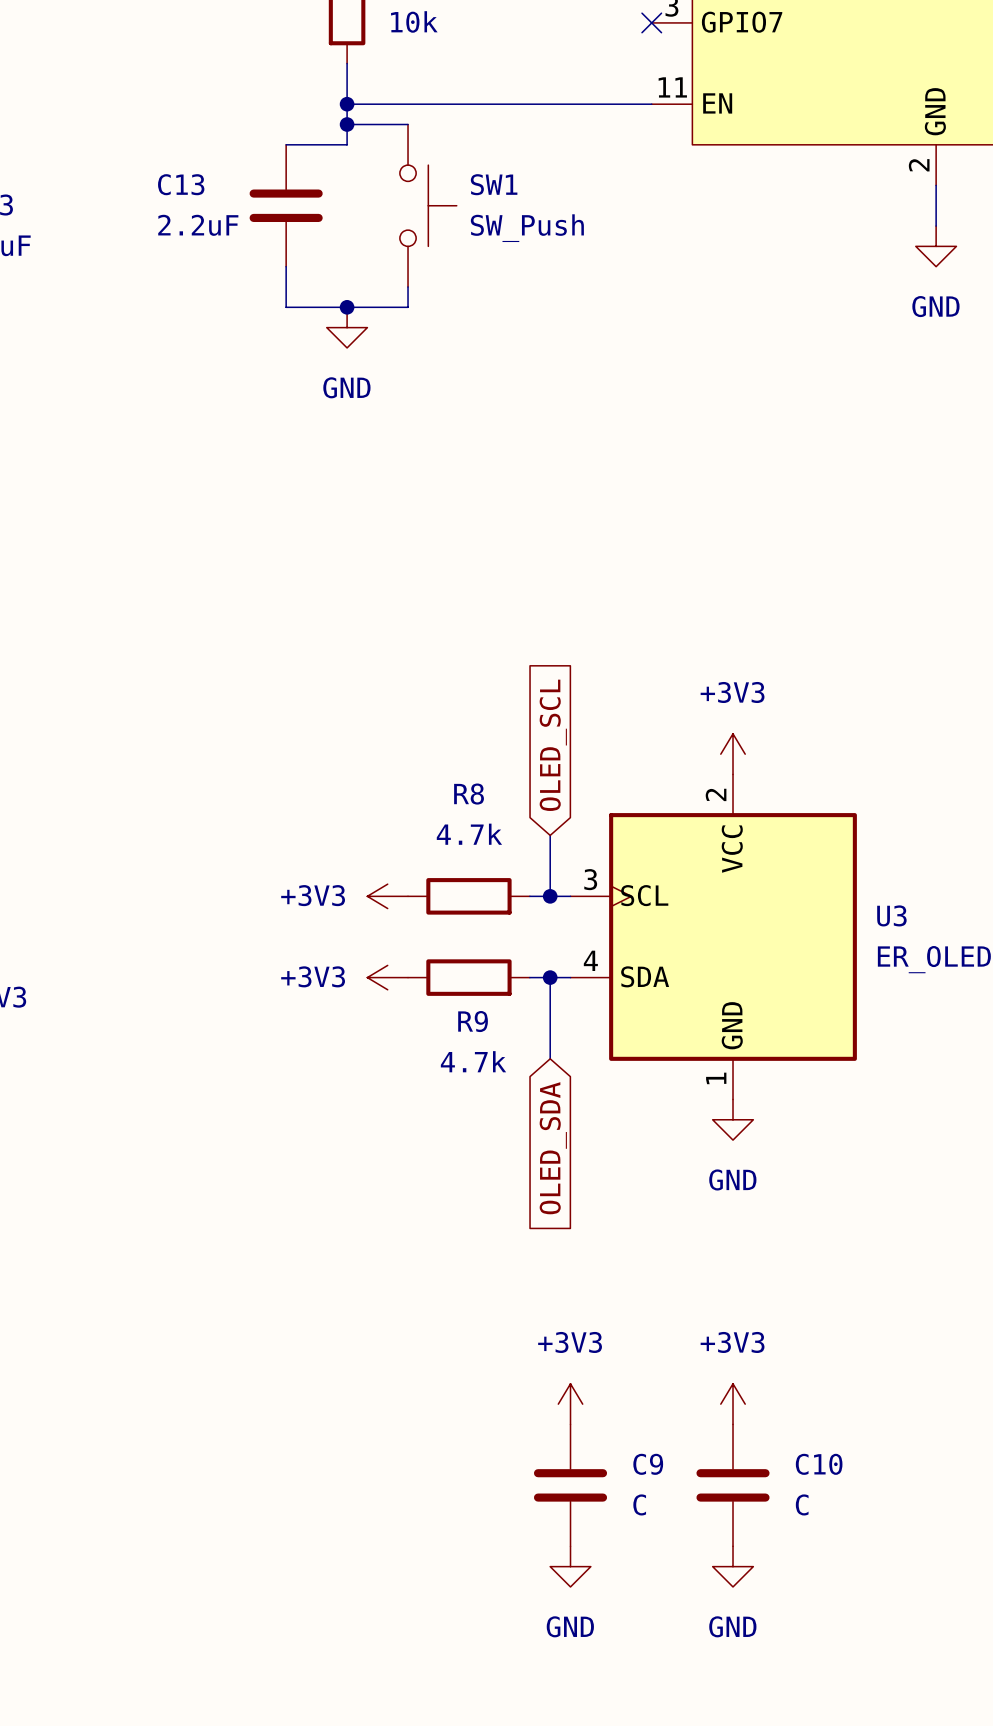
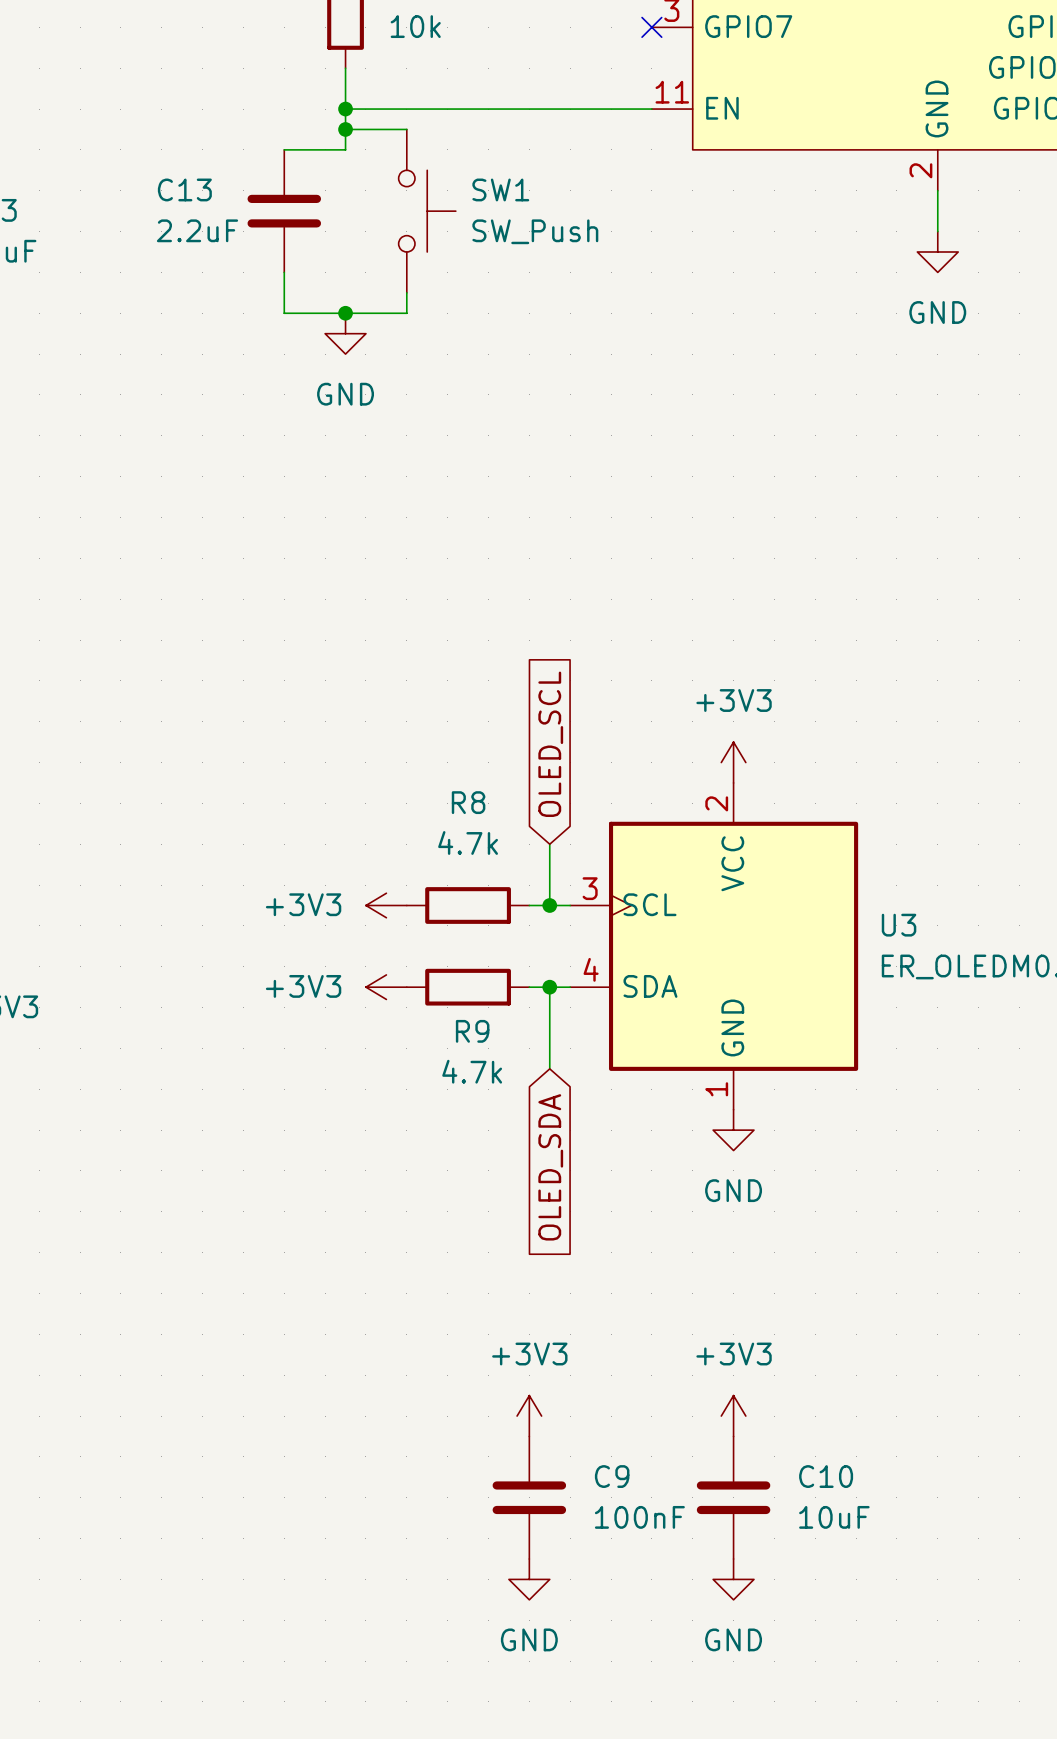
power symbol position: +3V3 (570, 1404) -> +3V3 (529, 1416)
C9 position: (570, 1485) -> (529, 1497)
C9 value: C (639, 1504) -> 100nF (639, 1517)
C10 value: C (802, 1504) -> 10uF (834, 1517)
power symbol position: GND (570, 1566) -> GND (529, 1579)

